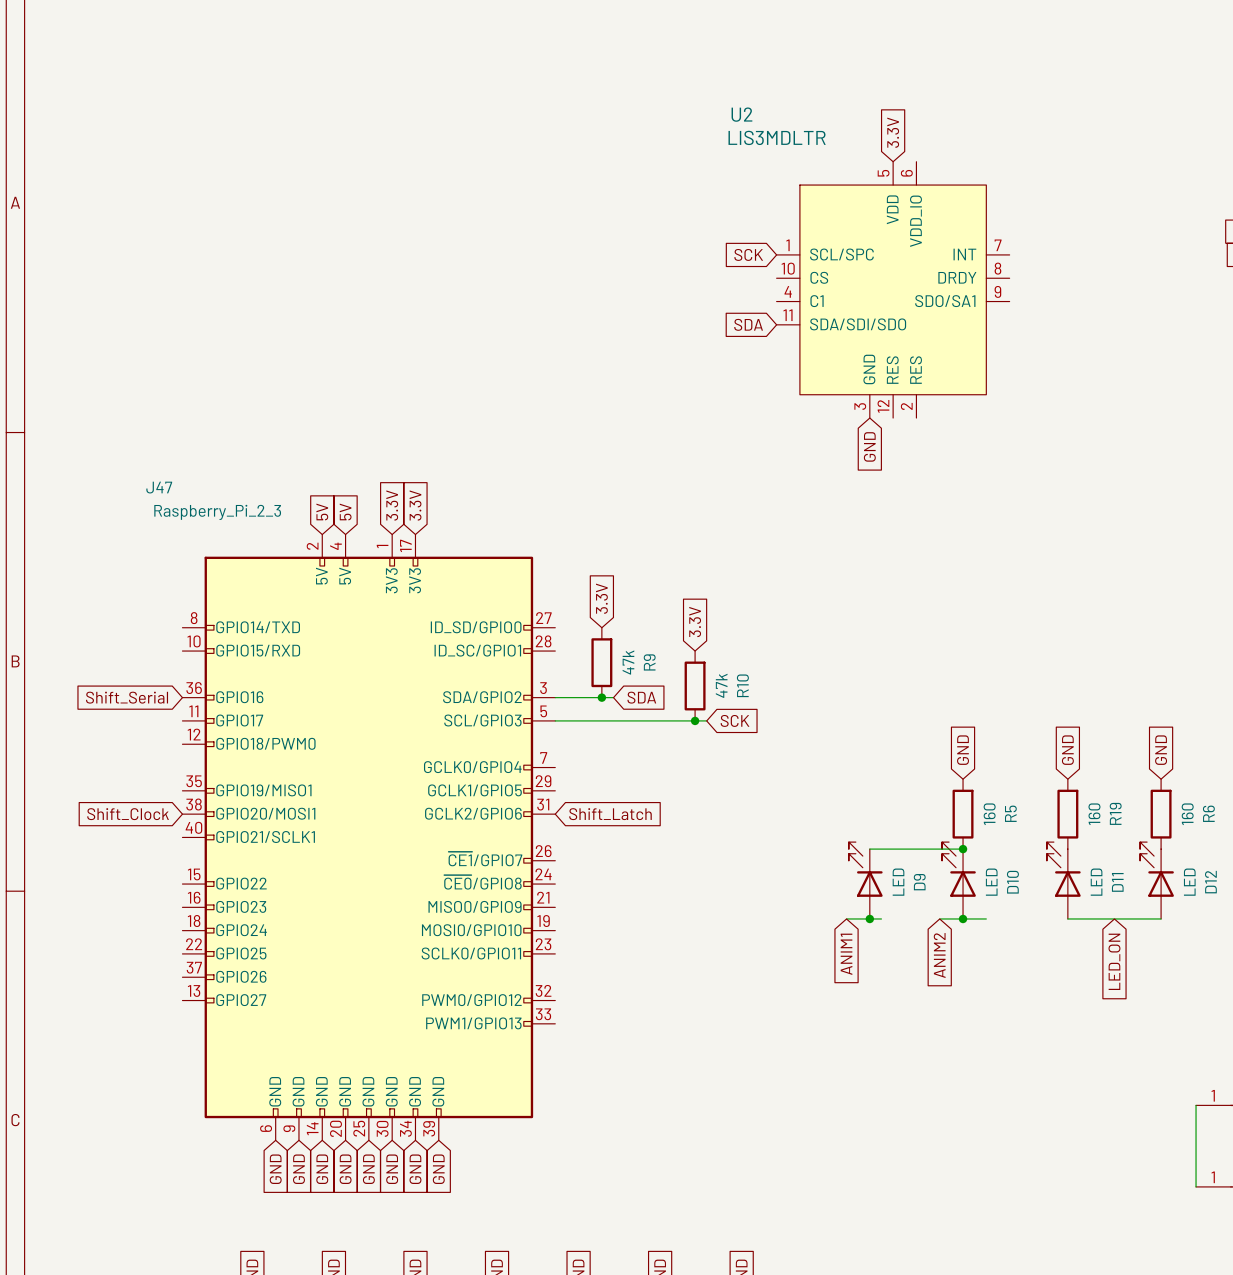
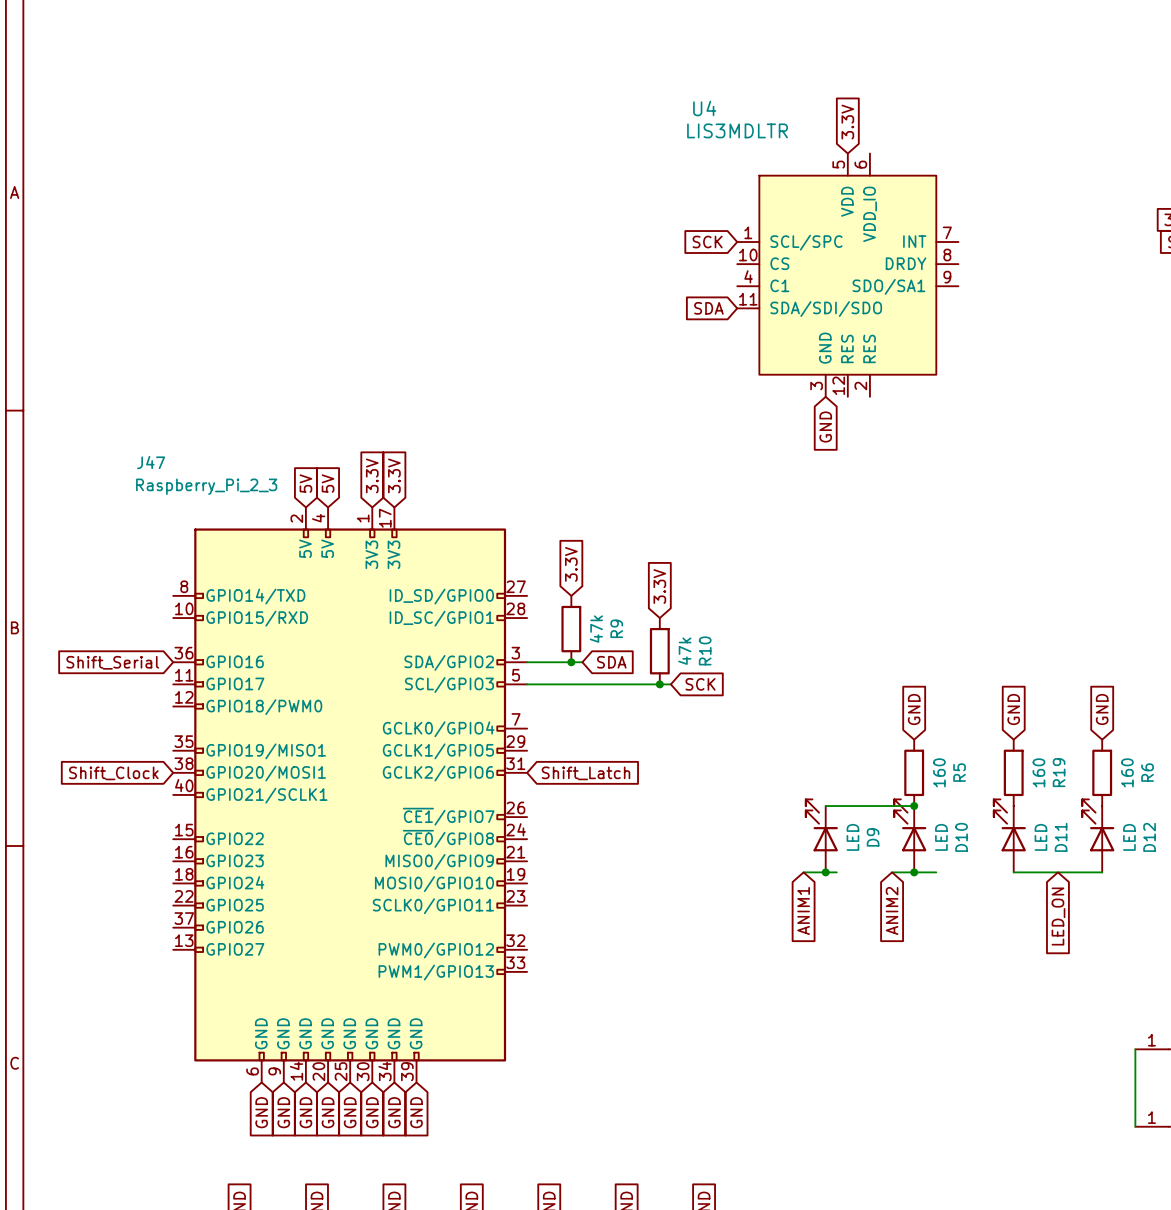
U2 name: U2 (741, 114) -> U4 (704, 108)

